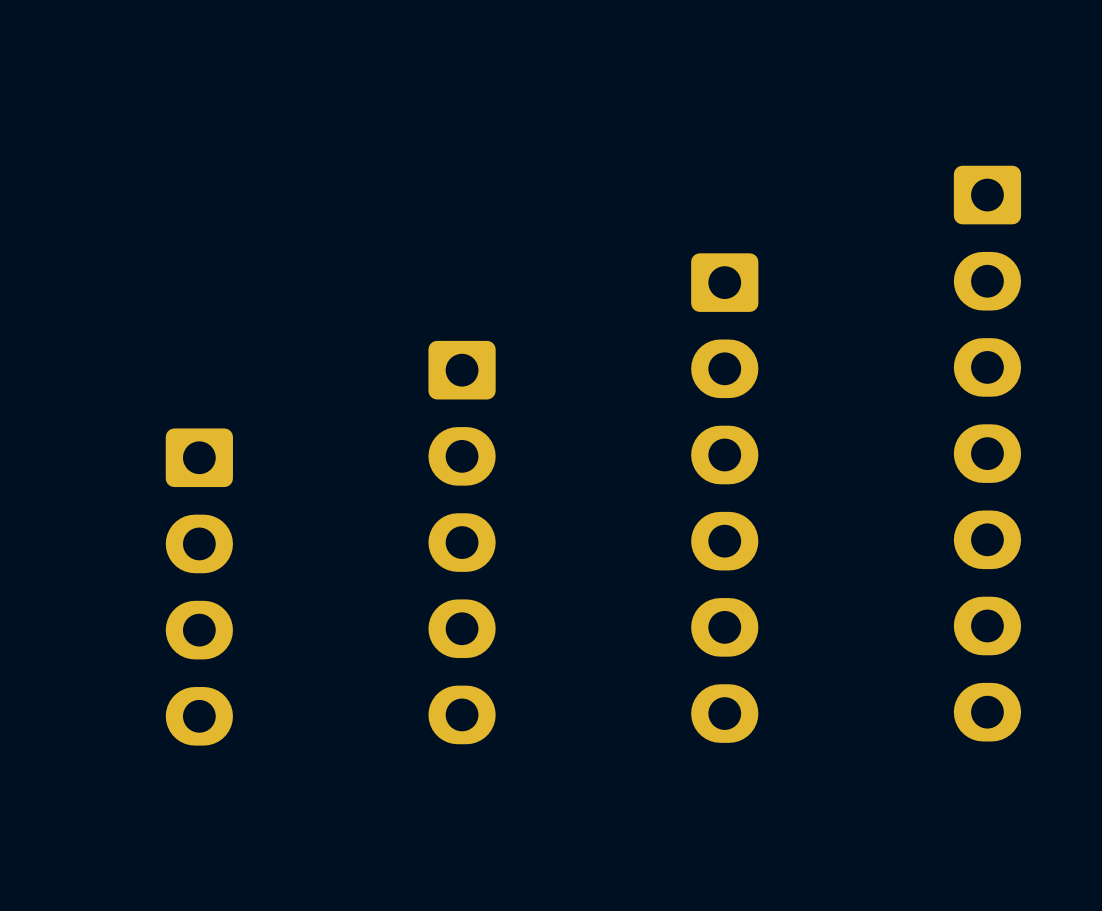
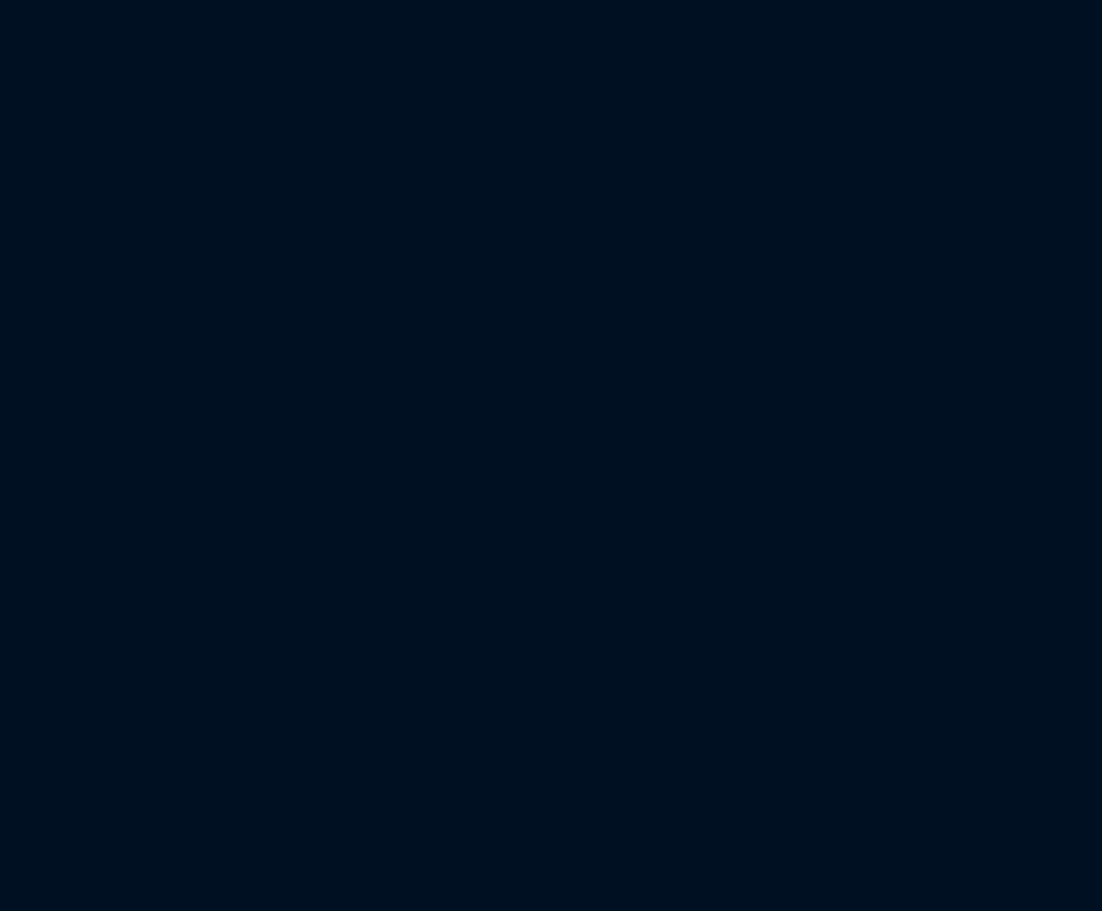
part: (987, 453) -> none
part: (724, 498) -> none
part: (462, 542) -> none
part: (199, 587) -> none

